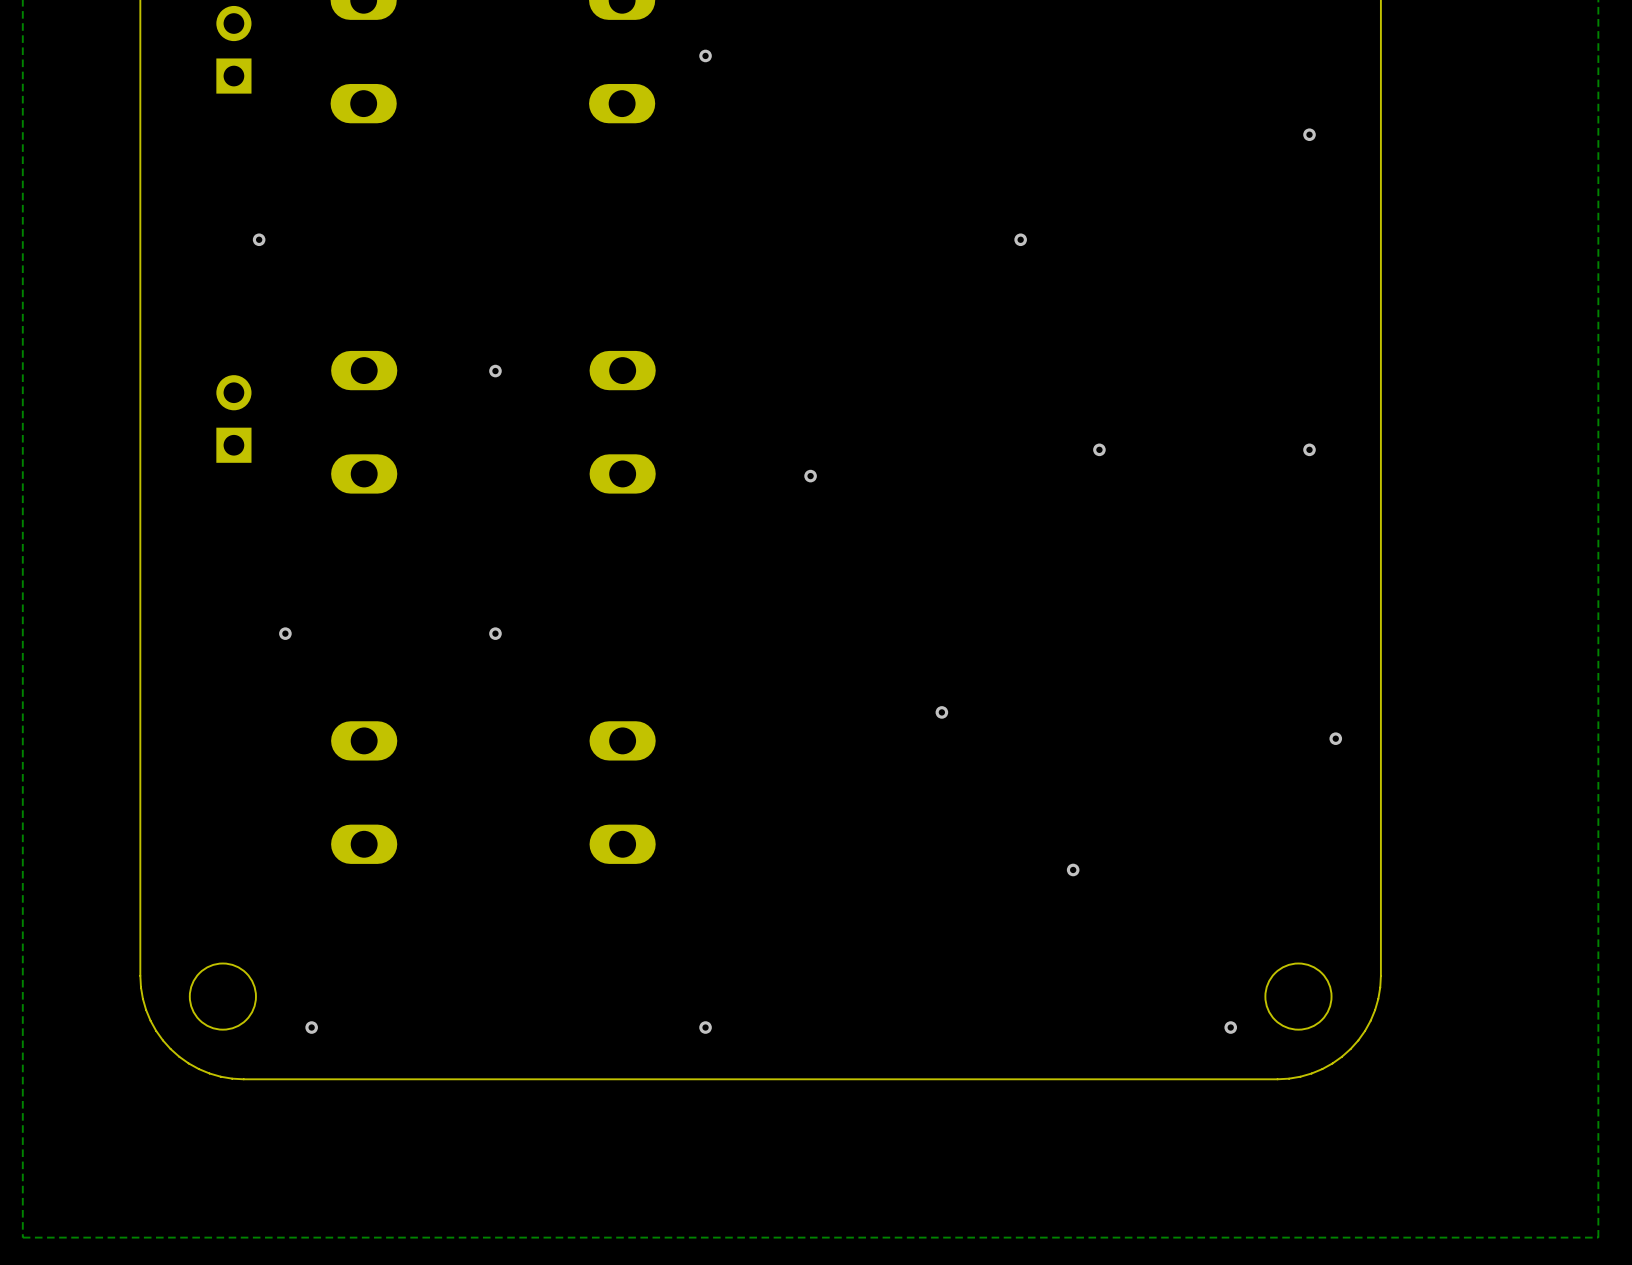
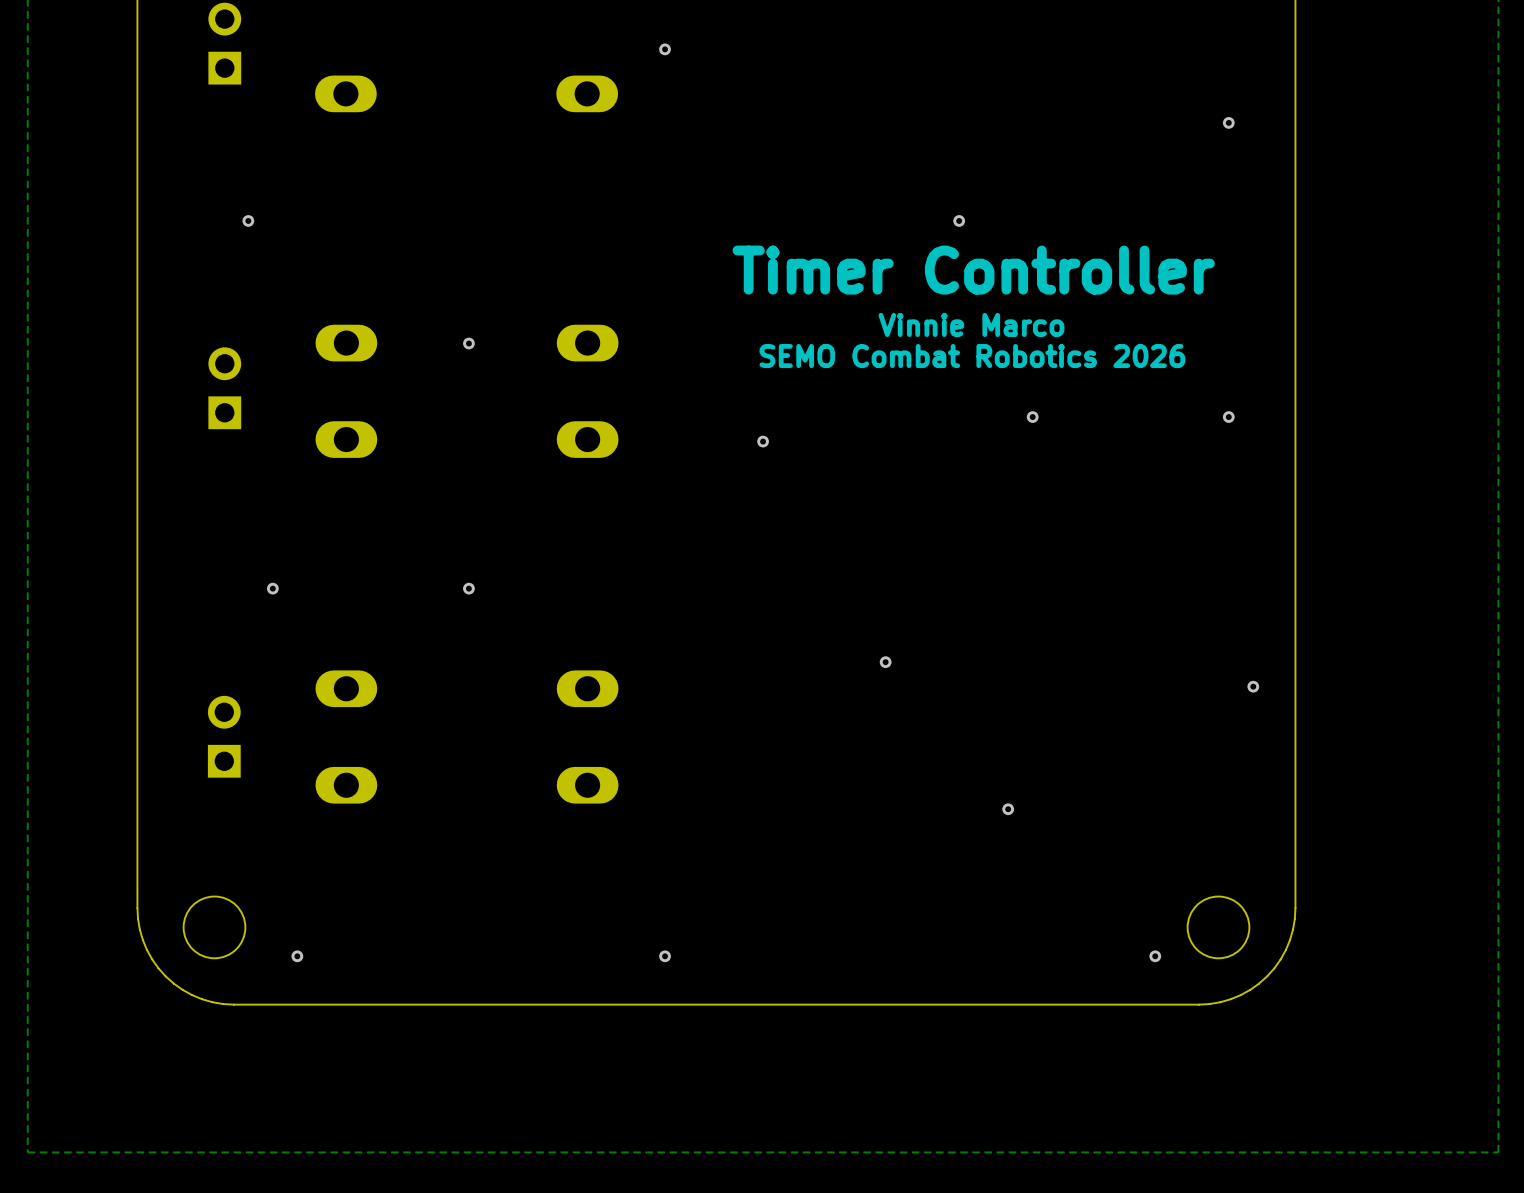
text: none -> Timer Controller (973, 270)
text: none -> Vinnie Marco (971, 324)
text: none -> SEMO Combat Robotics 2026 (972, 356)
part: none -> (224, 736)

